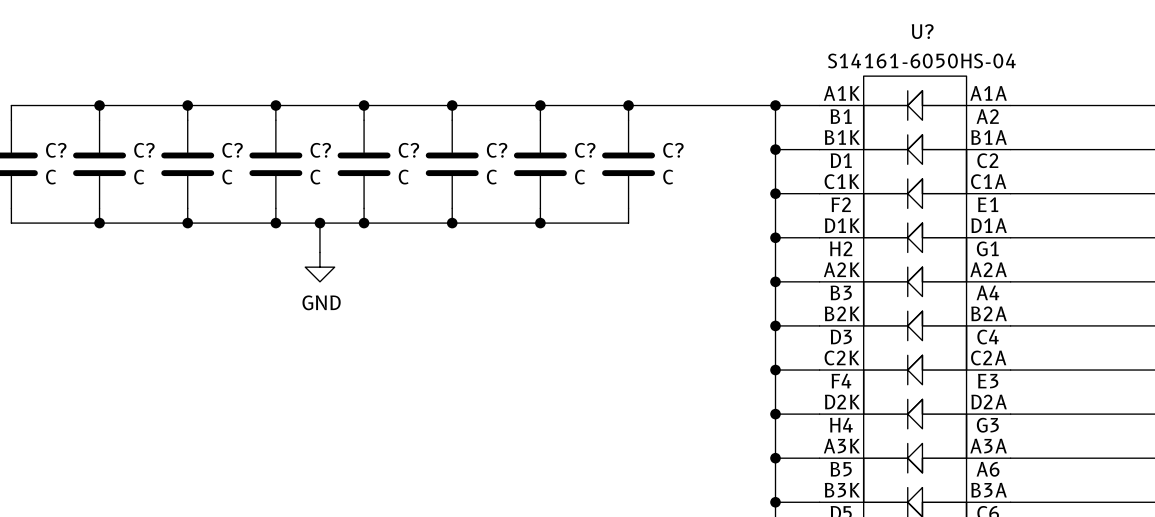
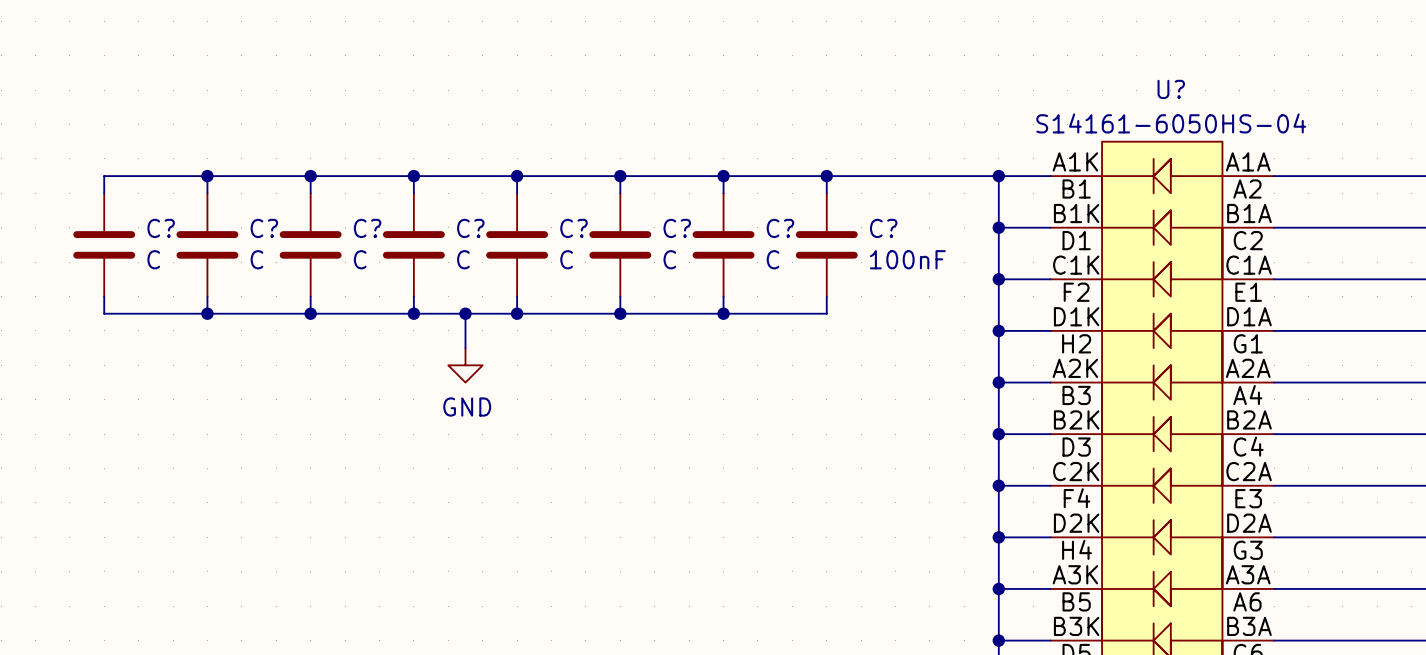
C? value: C (668, 177) -> 100nF (907, 259)

